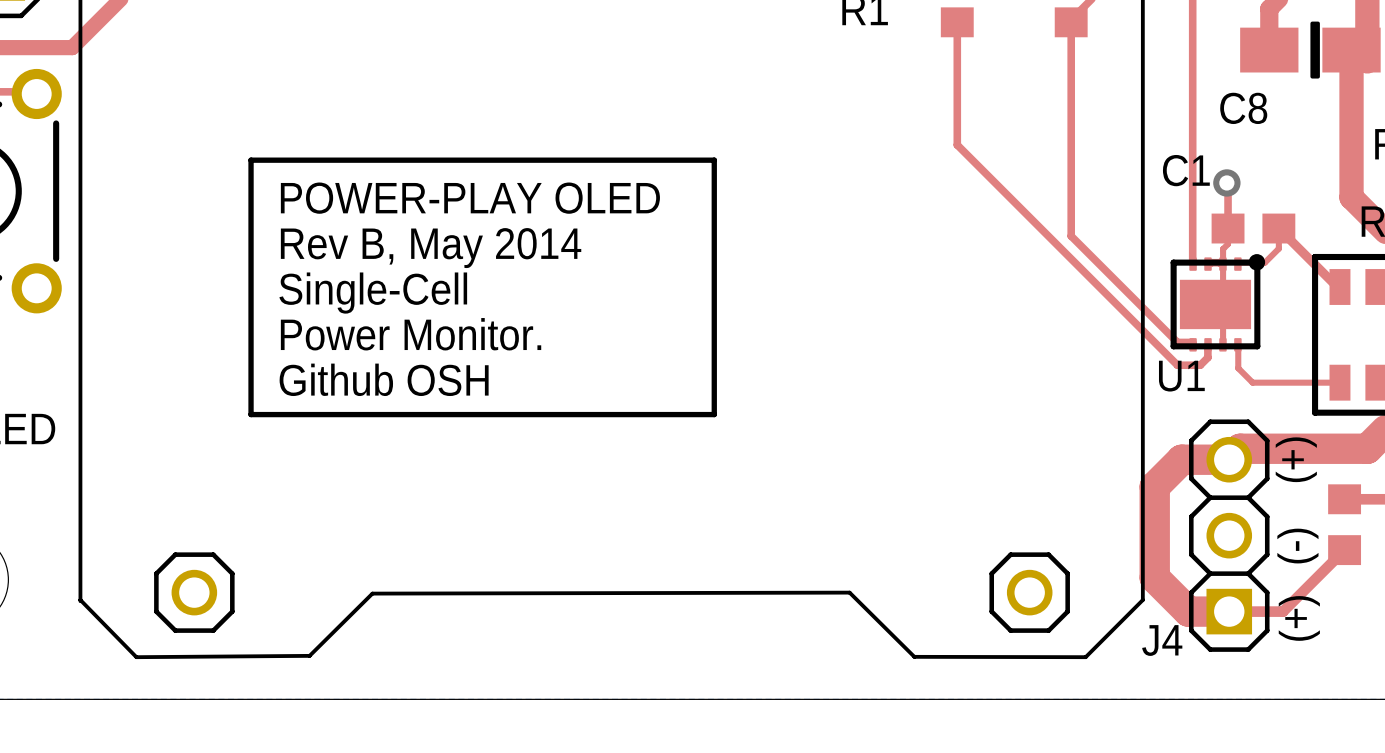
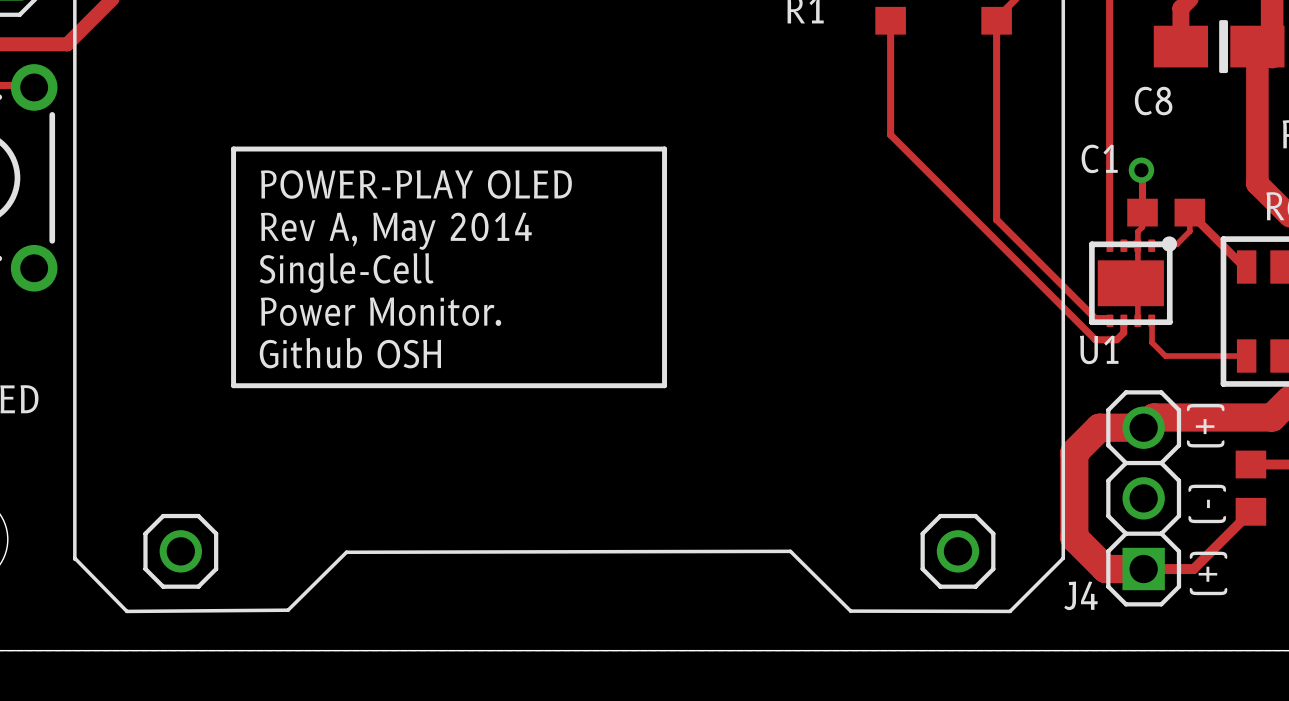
text: Rev B, May 2014 (431, 248) -> Rev A, May 2014 (396, 231)

